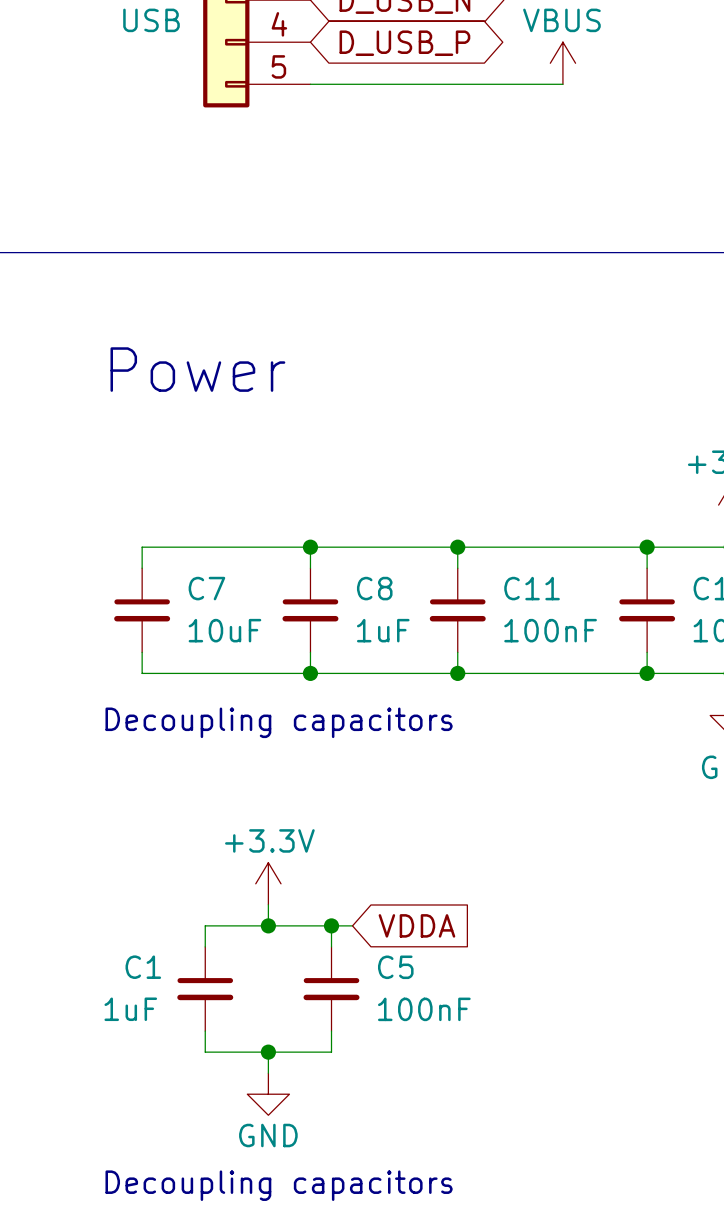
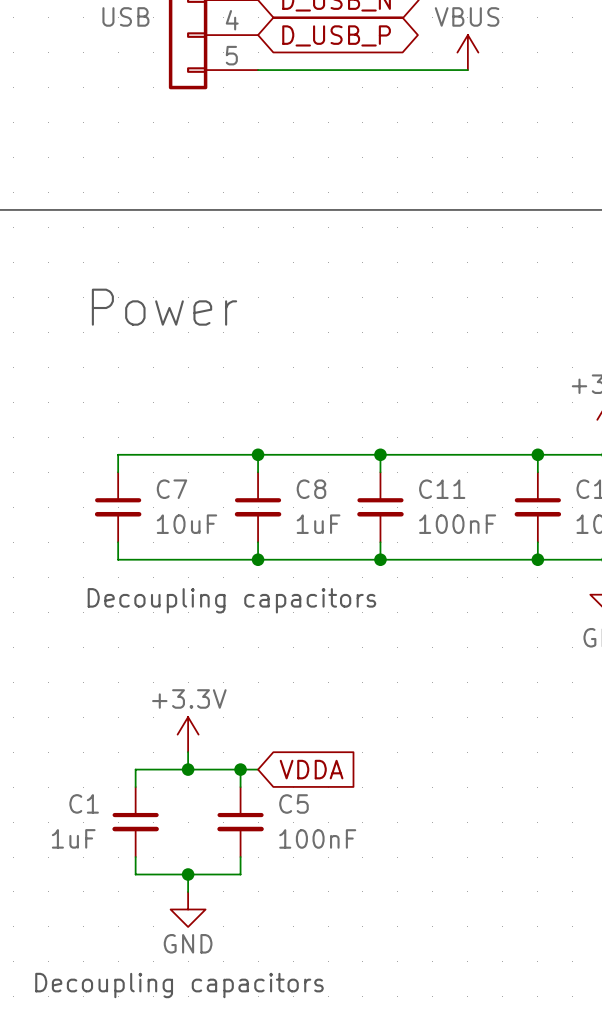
power symbol position: +3.3V (268, 883) -> +3.3V (188, 734)
wire: (268, 904) (268, 925) -> (188, 752) (188, 769)
wire: (205, 925) (205, 946) -> (170, 769) (135, 769) (135, 787)
junction: none -> (188, 769)
junction: (268, 925) -> none
junction: none -> (240, 769)
wire: (310, 925) (352, 925) -> none
wire: (331, 925) (331, 946) -> (240, 769) (240, 787)
junction: (331, 925) -> none
global label position: VDDA (416, 925) -> VDDA (311, 769)
C1 position: (205, 989) -> (135, 822)
C5 position: (331, 989) -> (240, 822)
wire: (205, 1031) (205, 1052) -> (135, 857) (135, 874) (170, 874)
wire: (331, 1031) (331, 1052) (289, 1052) -> (240, 857) (240, 874)
wire: (268, 1052) (268, 1073) -> (188, 874) (188, 891)
junction position: (268, 1052) -> (188, 874)
power symbol position: GND (268, 1094) -> GND (188, 909)
text position: Decoupling capacitors (279, 1185) -> Decoupling capacitors (179, 985)

